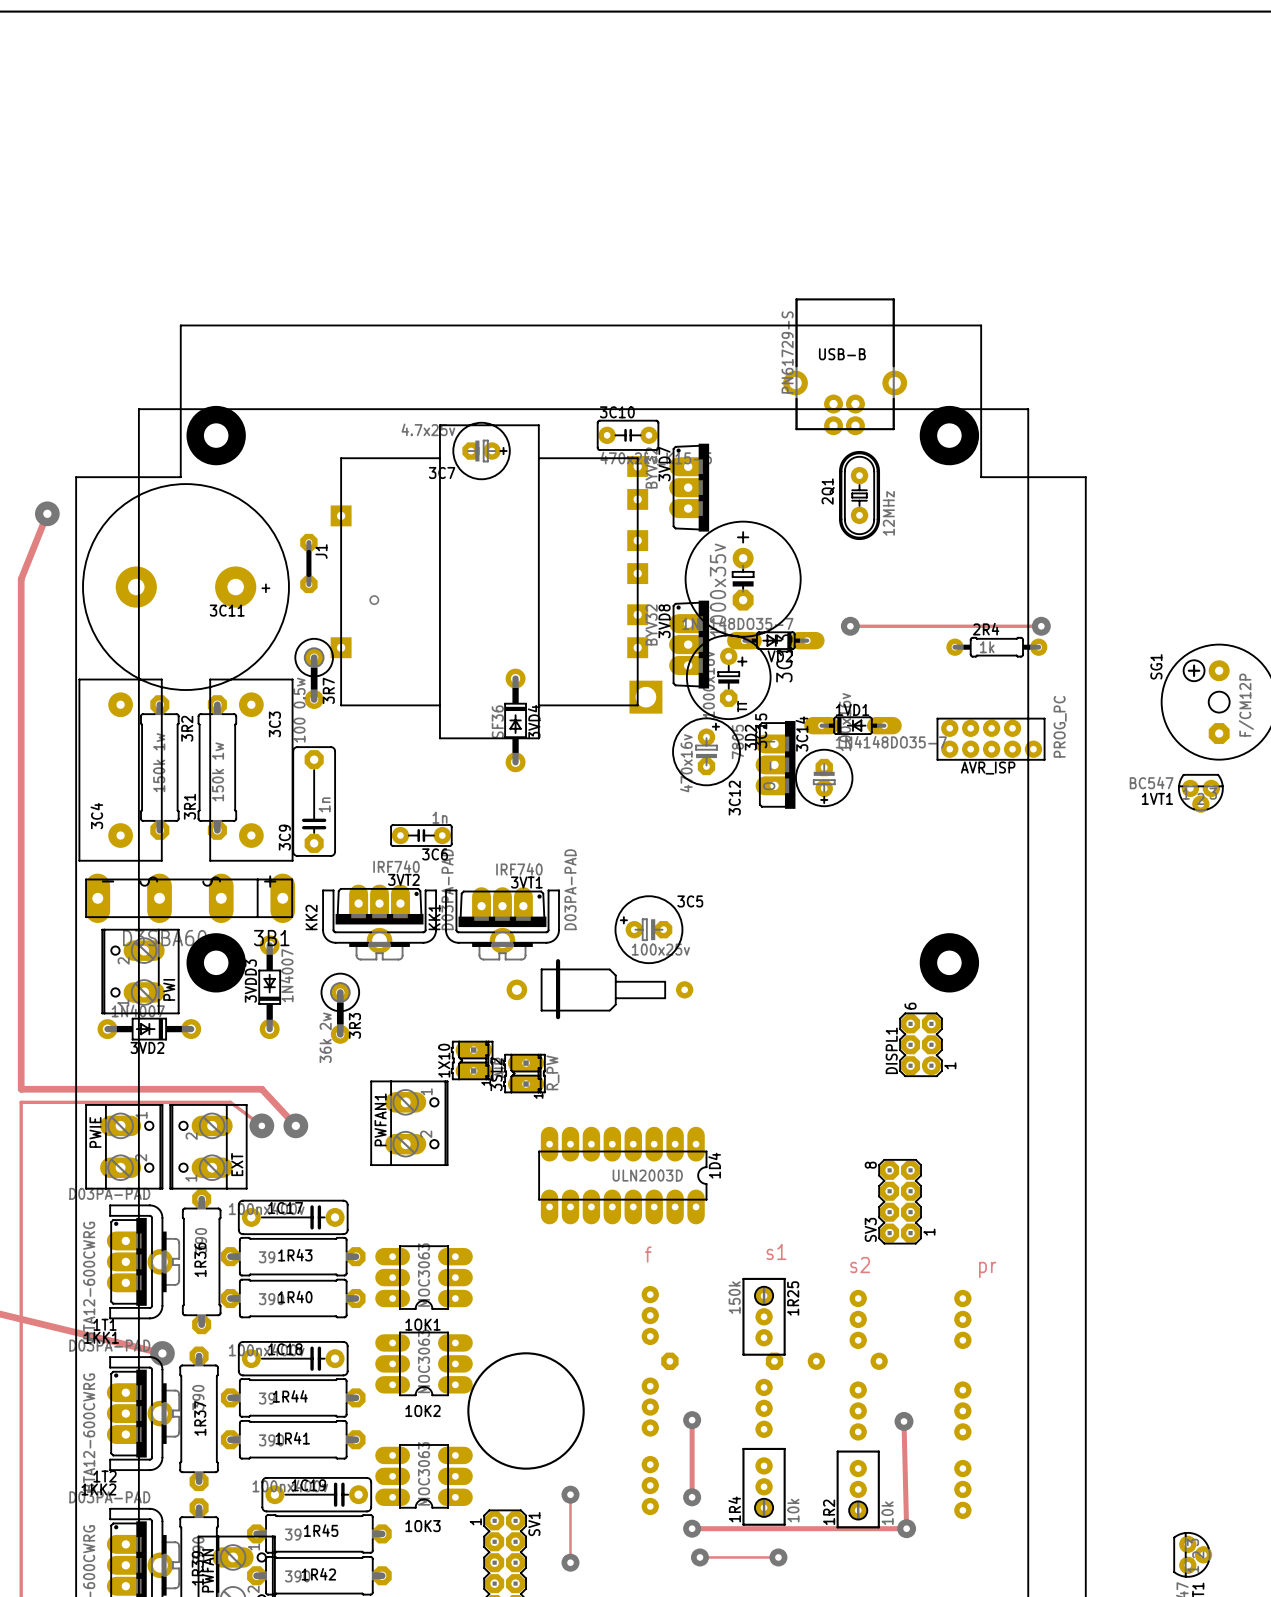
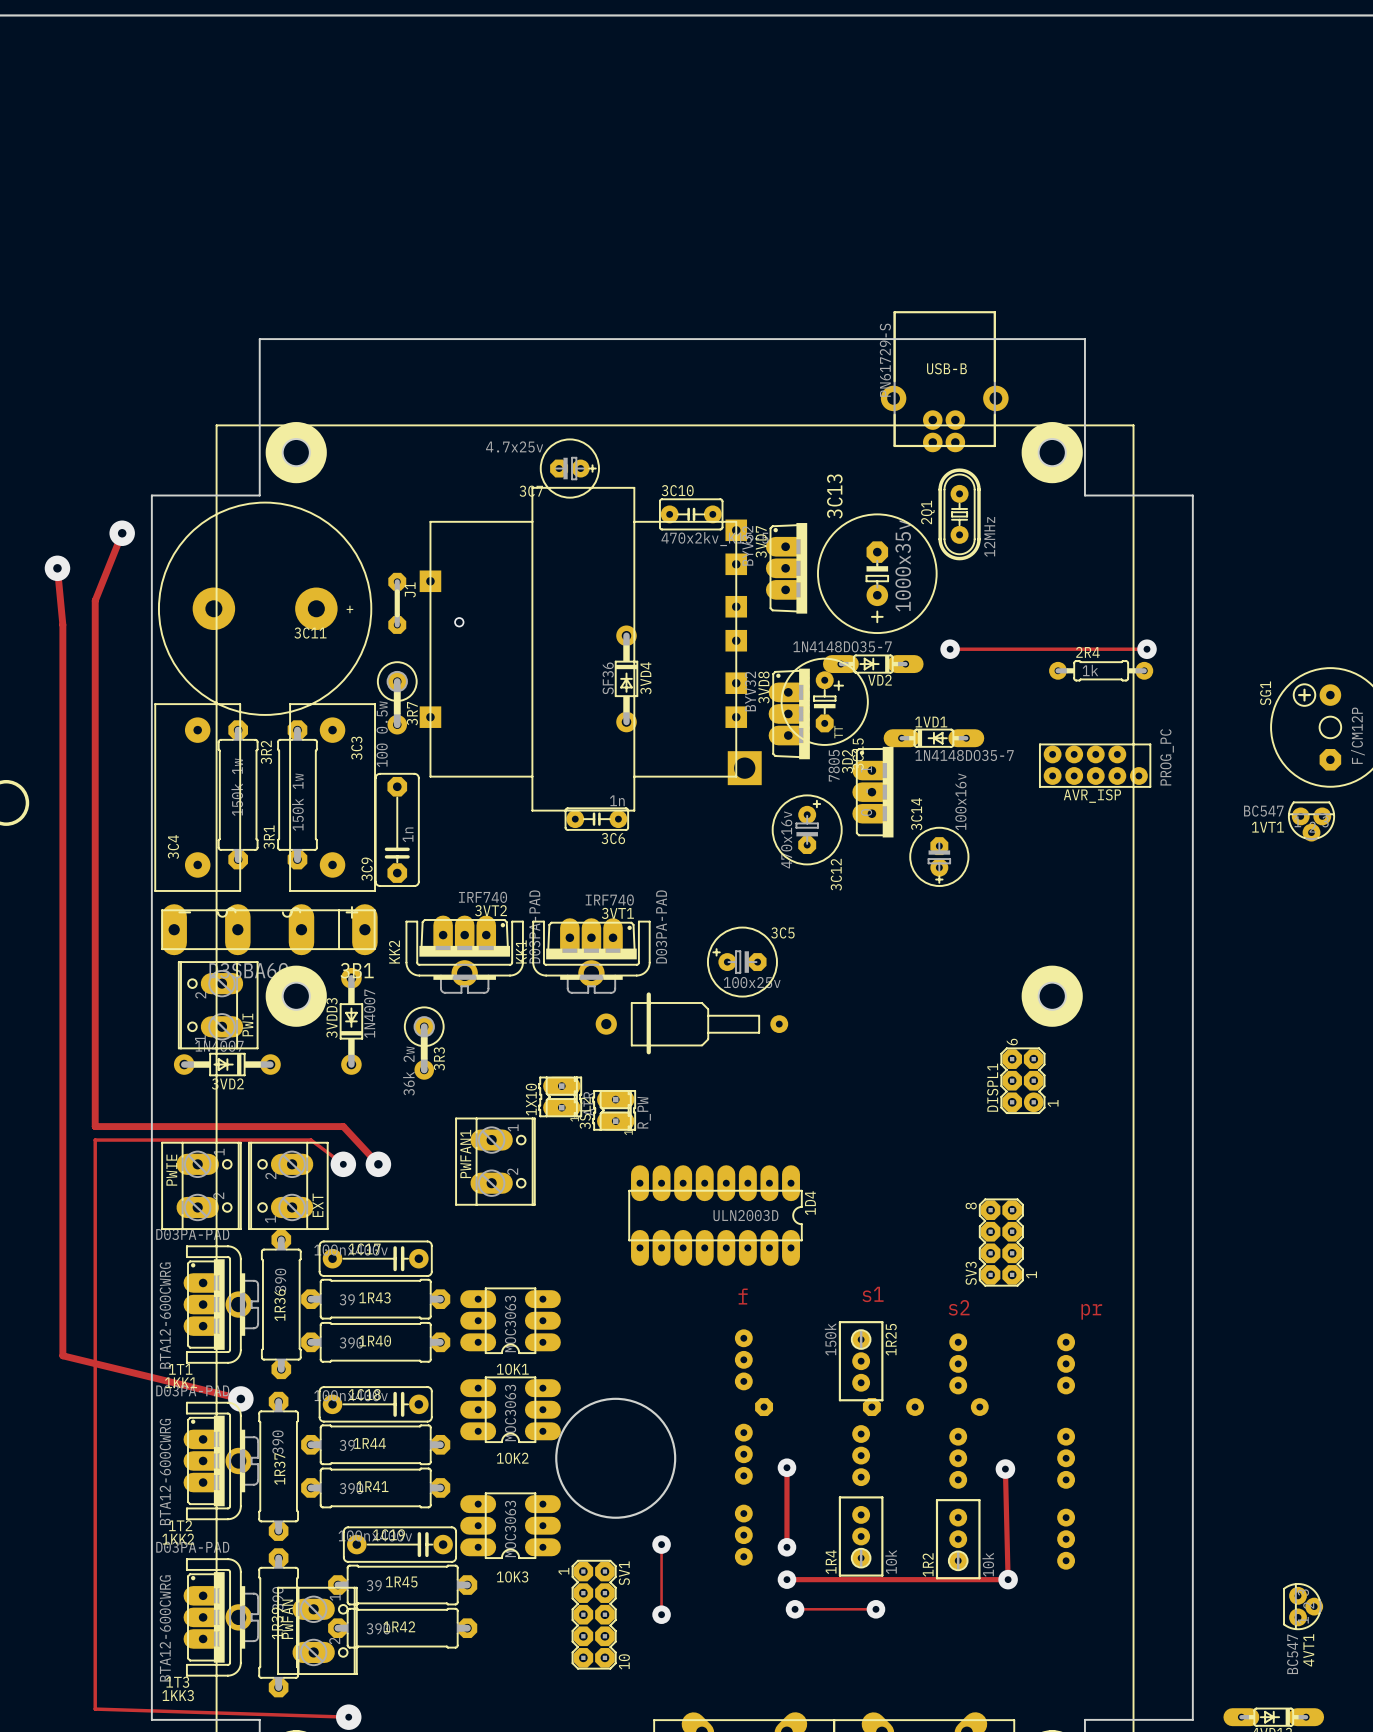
3C10 position: (628, 435) -> (691, 514)
3VD7 position: (689, 487) -> (786, 568)
J1 position: (308, 563) -> (397, 603)
3C13 rotation: 0° (743, 579) -> 180° (877, 573)
part position: (496, 581) -> (590, 649)
3VD8 position: (689, 644) -> (789, 713)
1VD1 footprint: [804, 716, 902, 735] -> [883, 728, 985, 748]
3VD4 position: (515, 720) -> (626, 678)
3C12 position: (706, 751) -> (807, 829)
3C14 position: (824, 777) -> (939, 856)
3C6 position: (421, 835) -> (596, 819)

